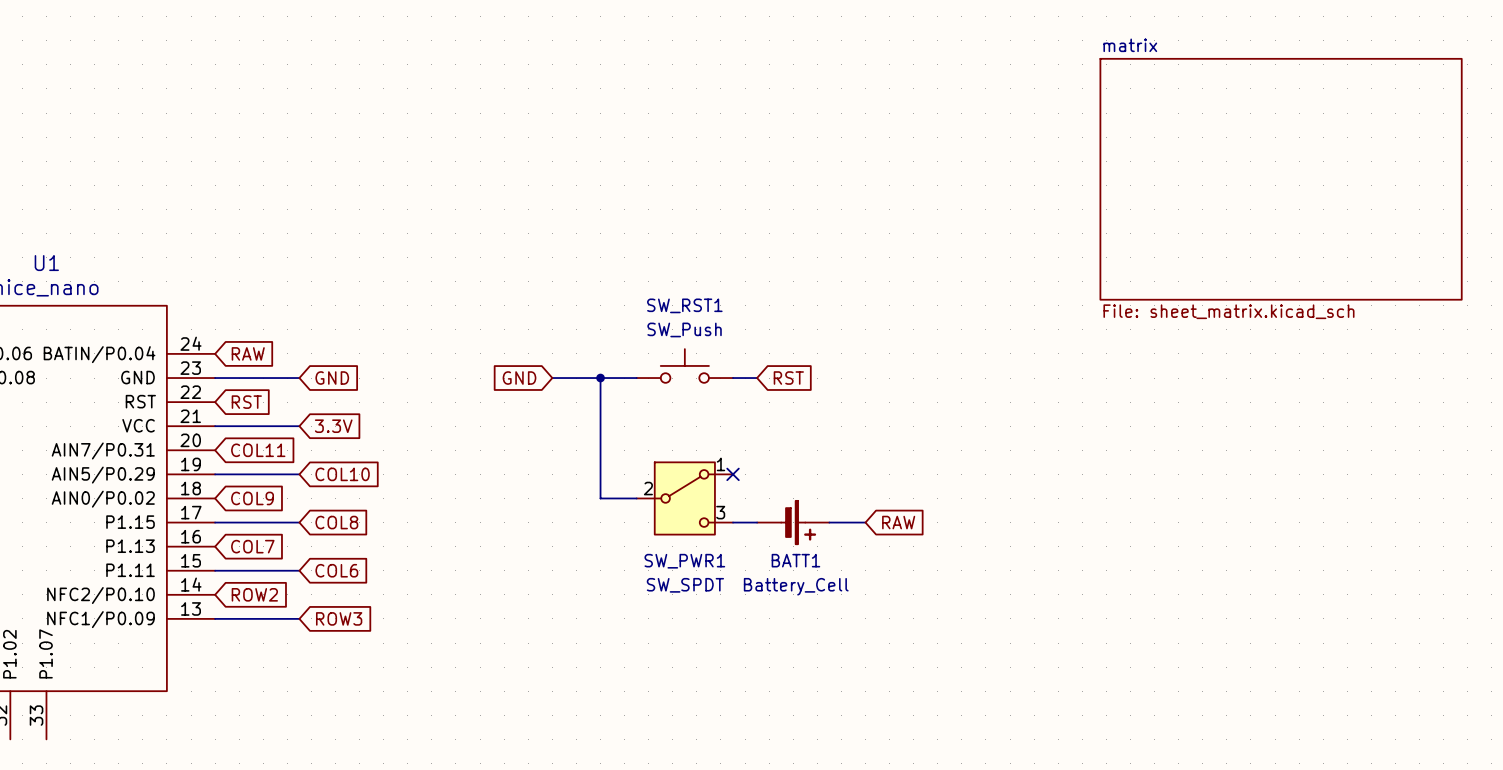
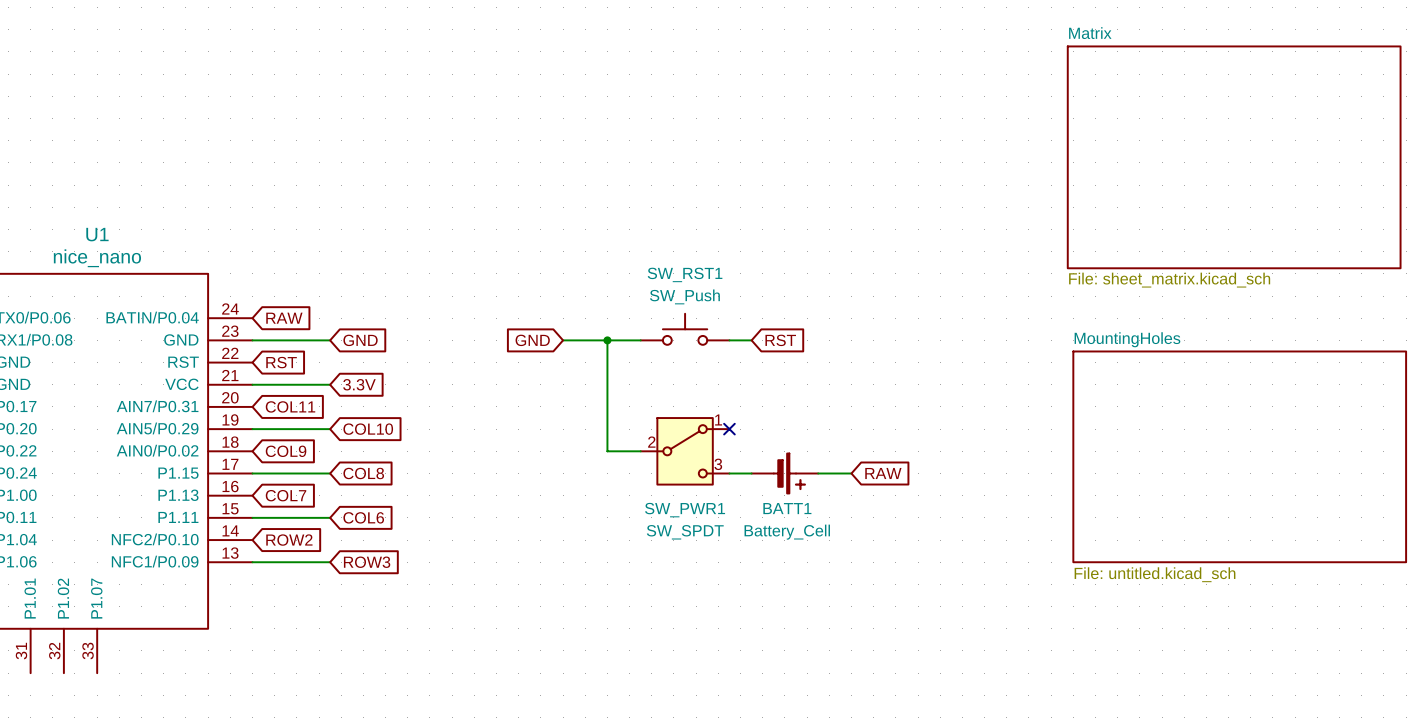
sheet matrix name: matrix (1130, 45) -> Matrix (1090, 33)
sheet MountingHoles: none -> File: untitled.kicad_sch (1239, 456)

